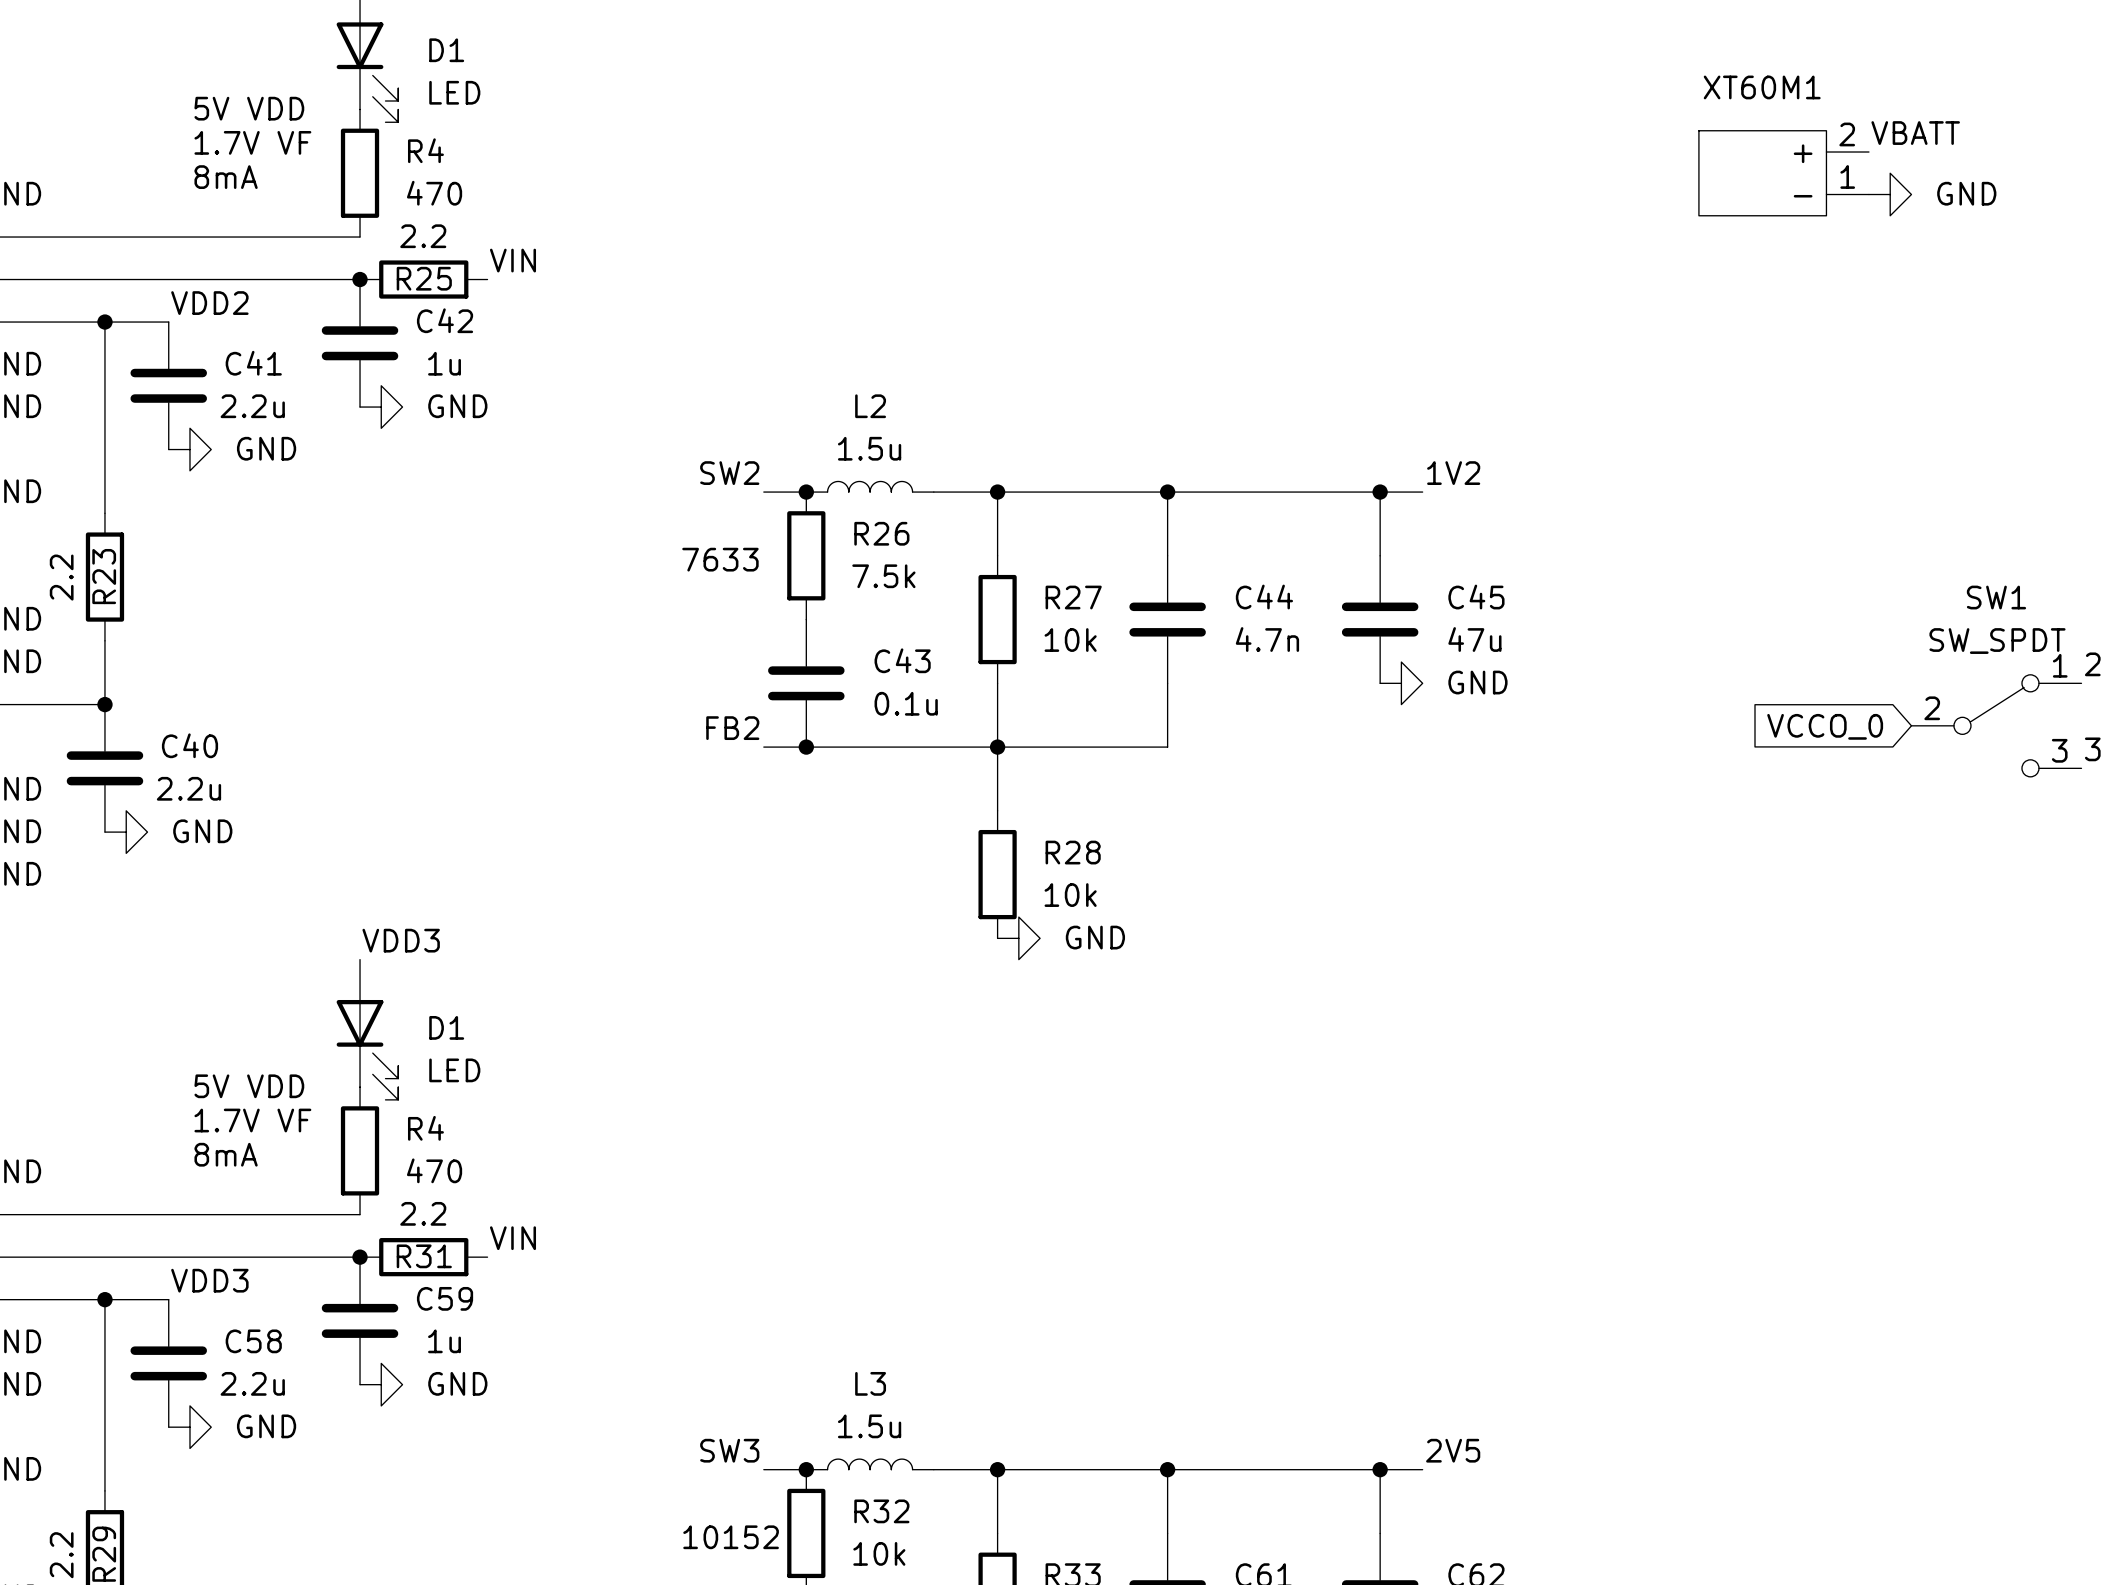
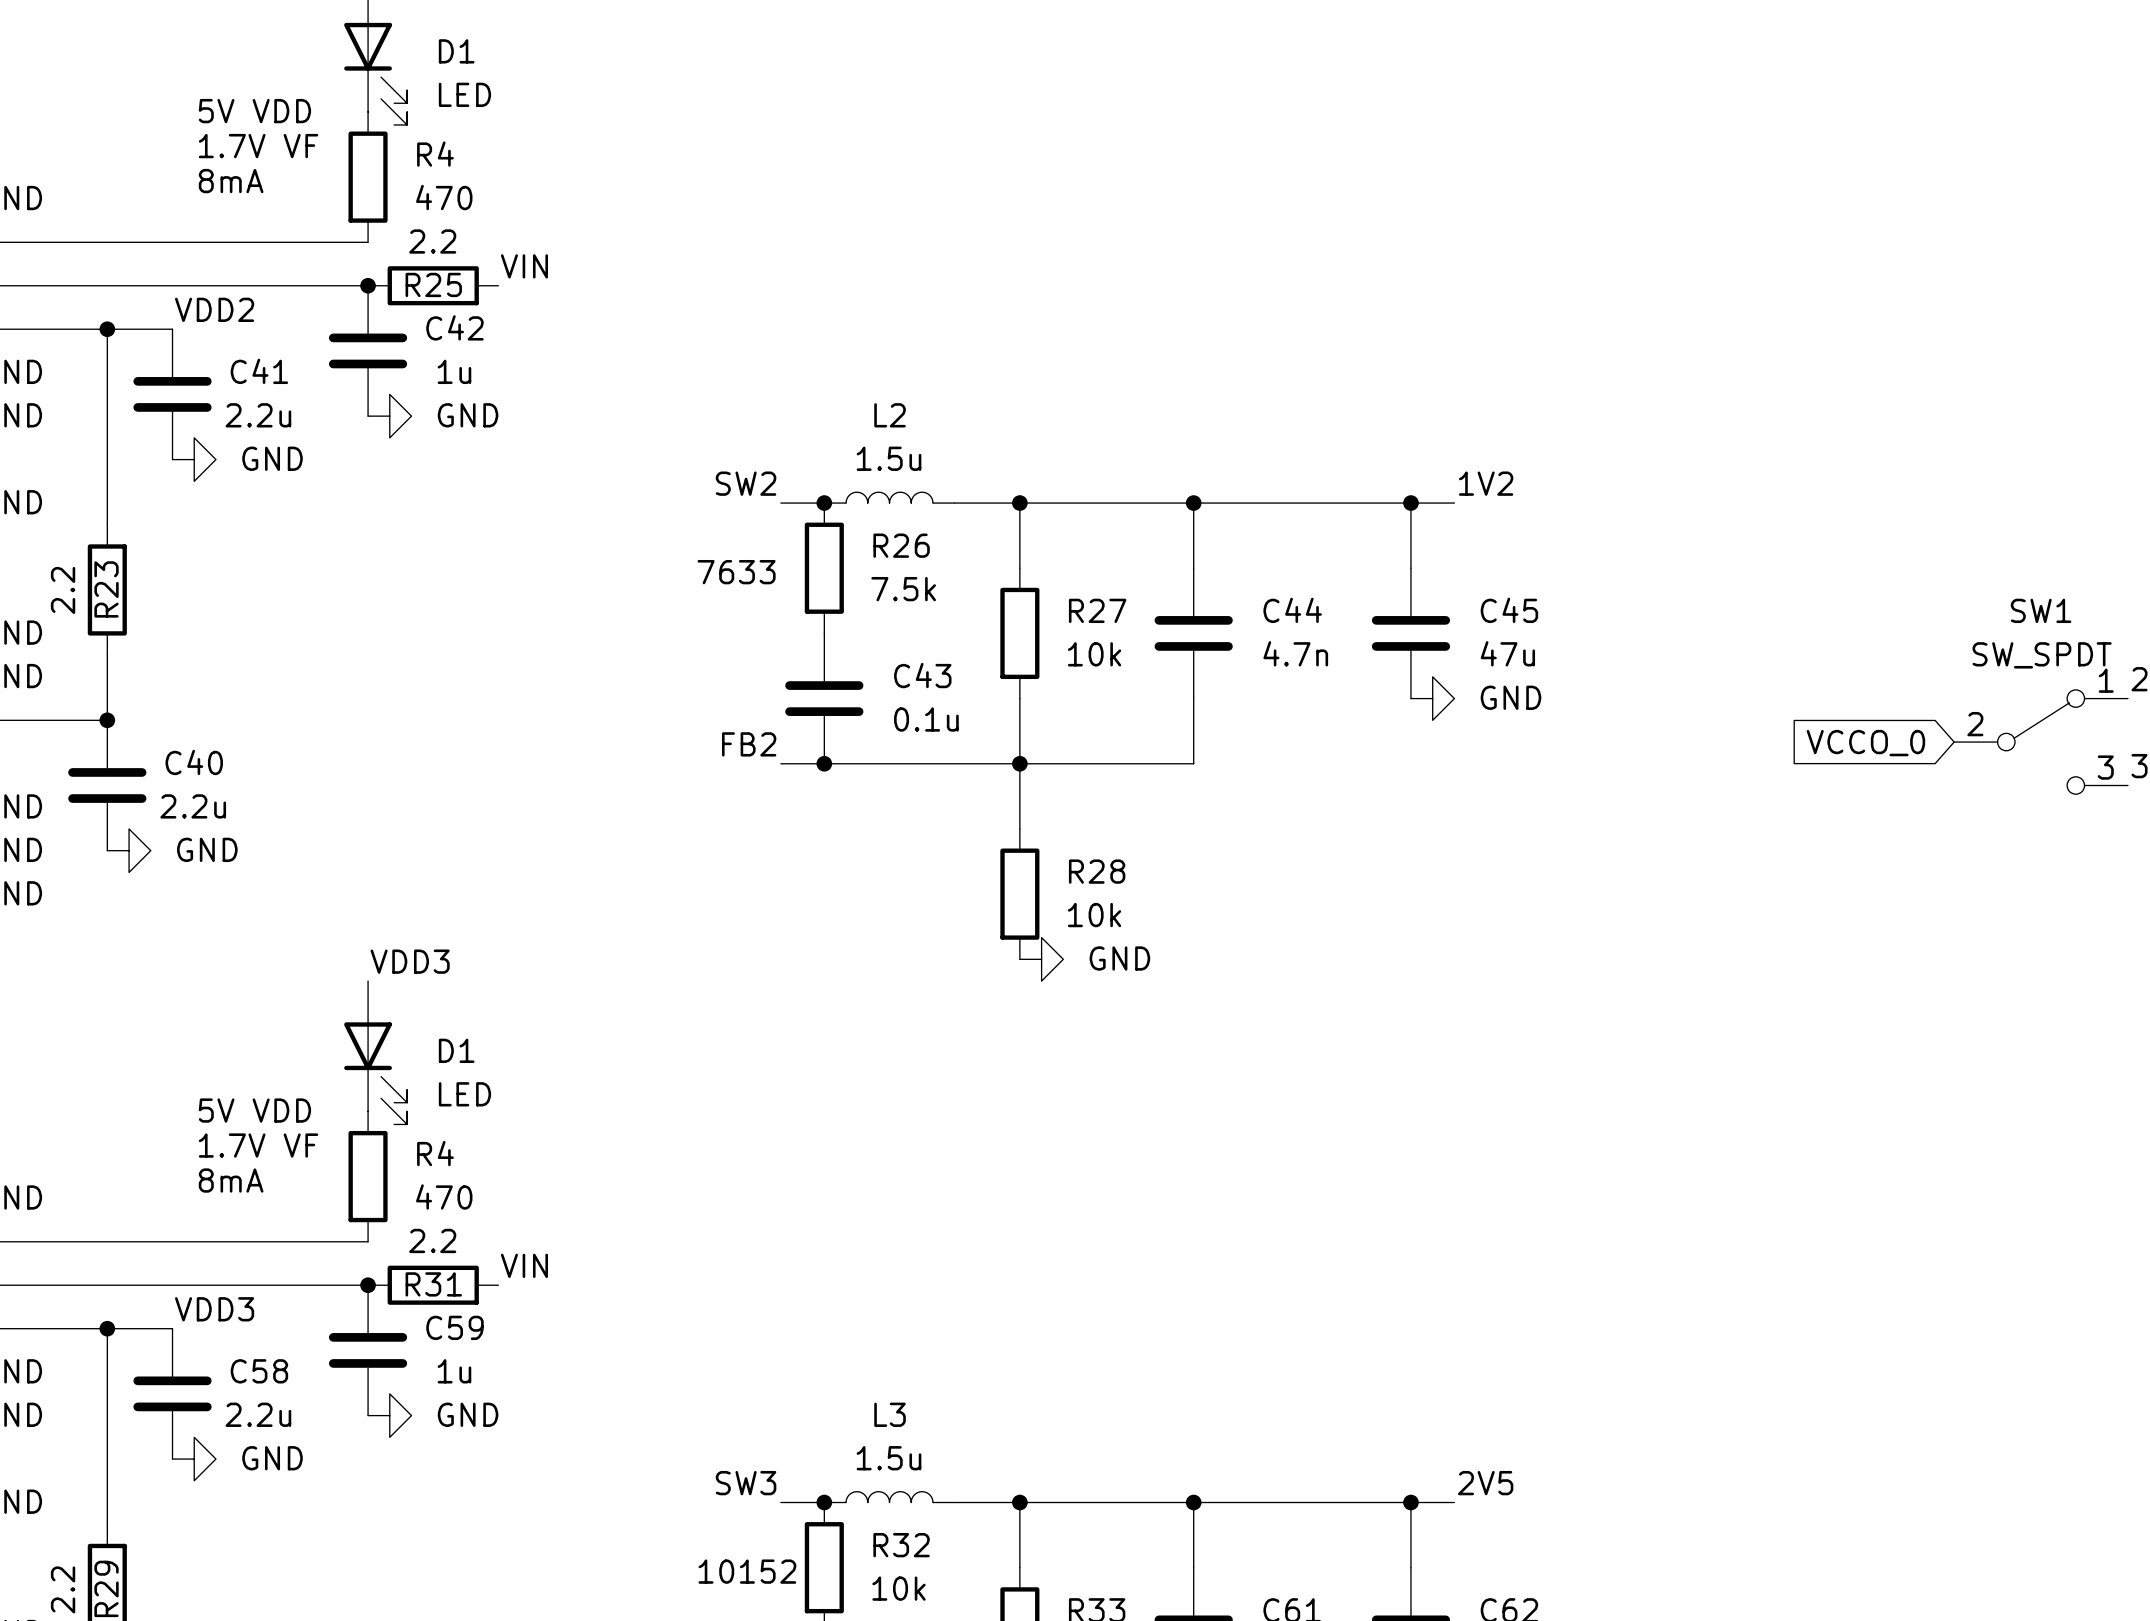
label: VBATT (1915, 133) -> none
XT60M1: (1783, 173) -> none
power symbol: GND (1890, 194) -> none

